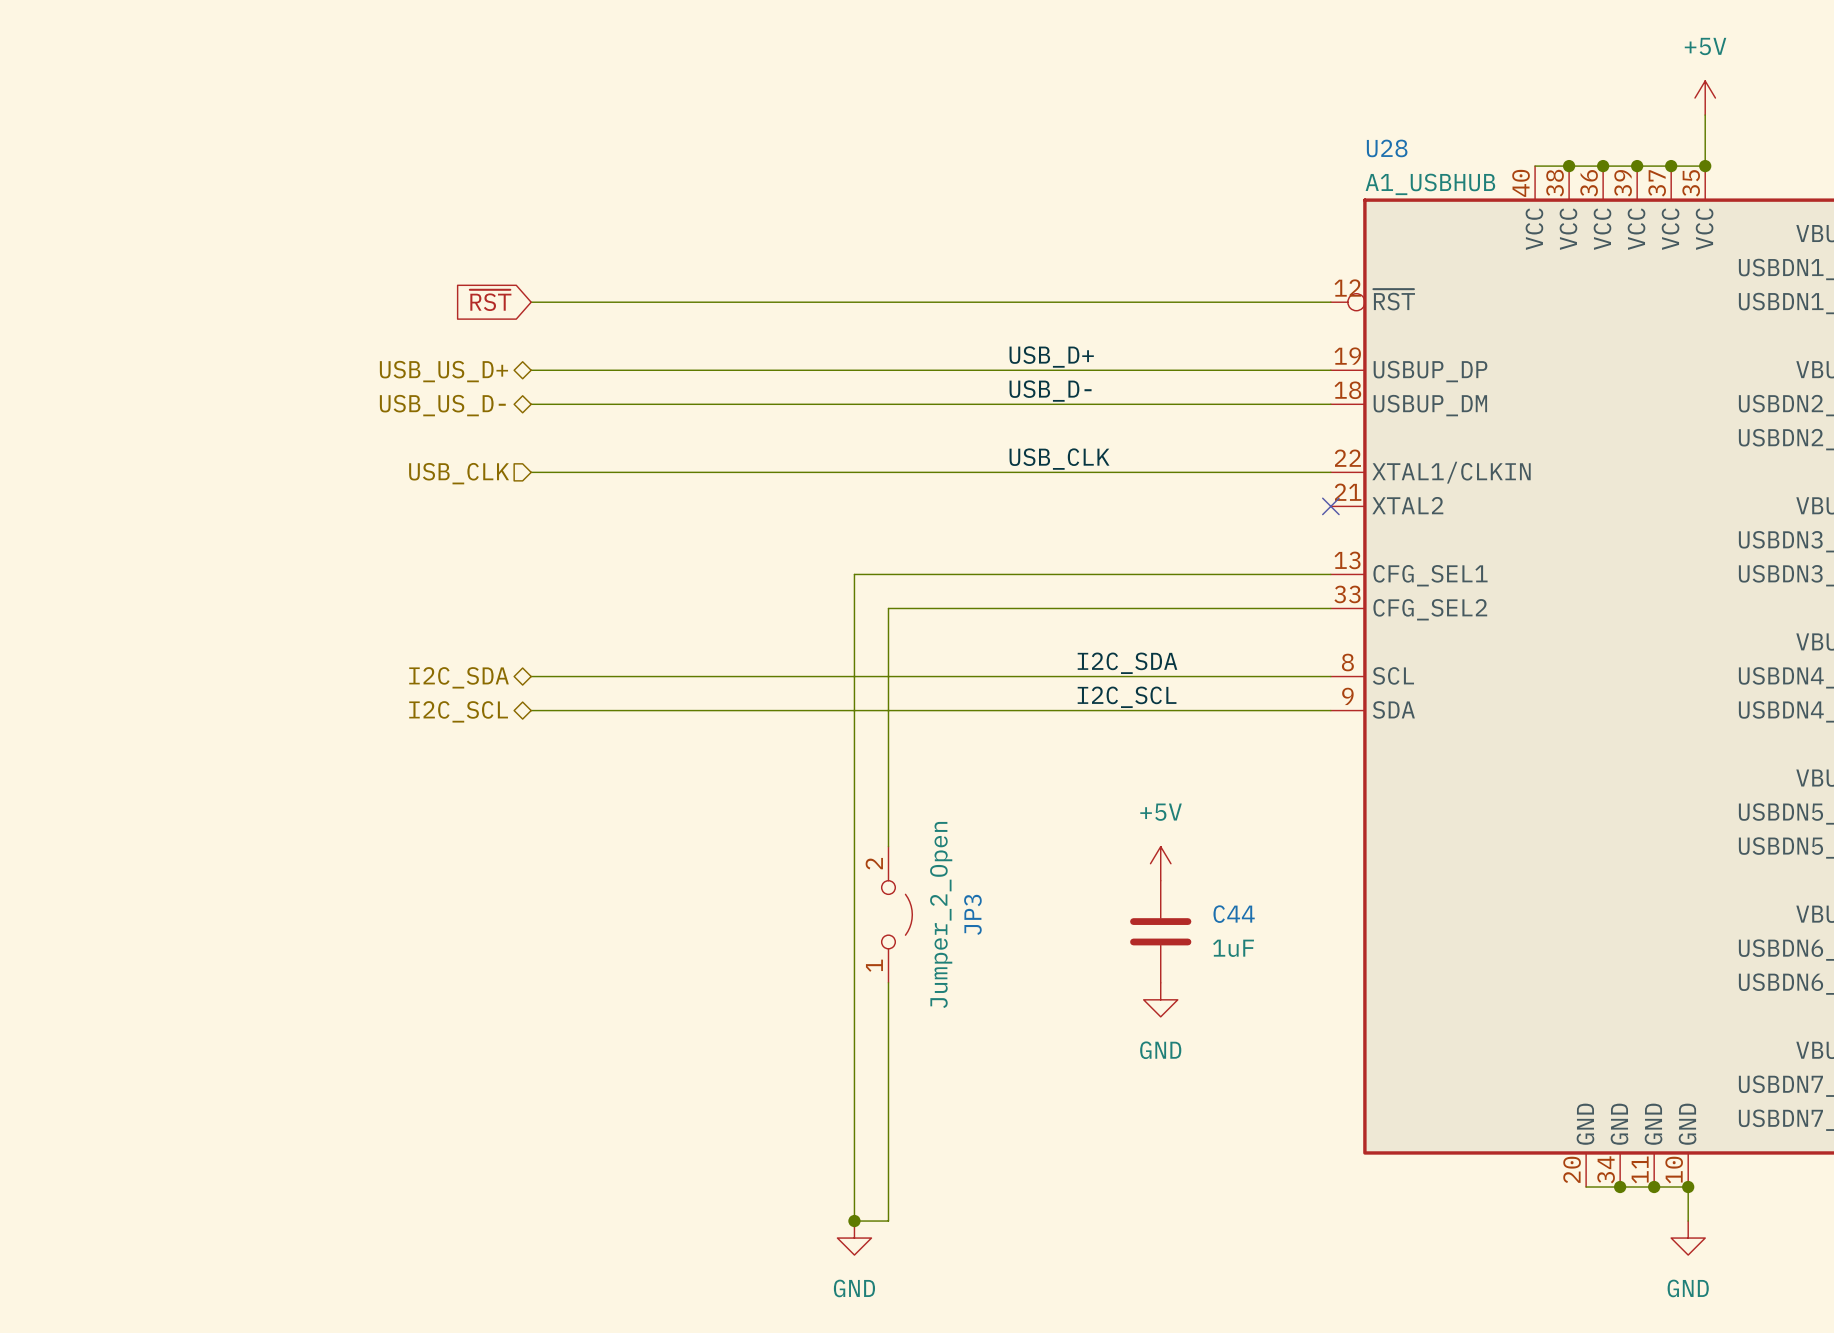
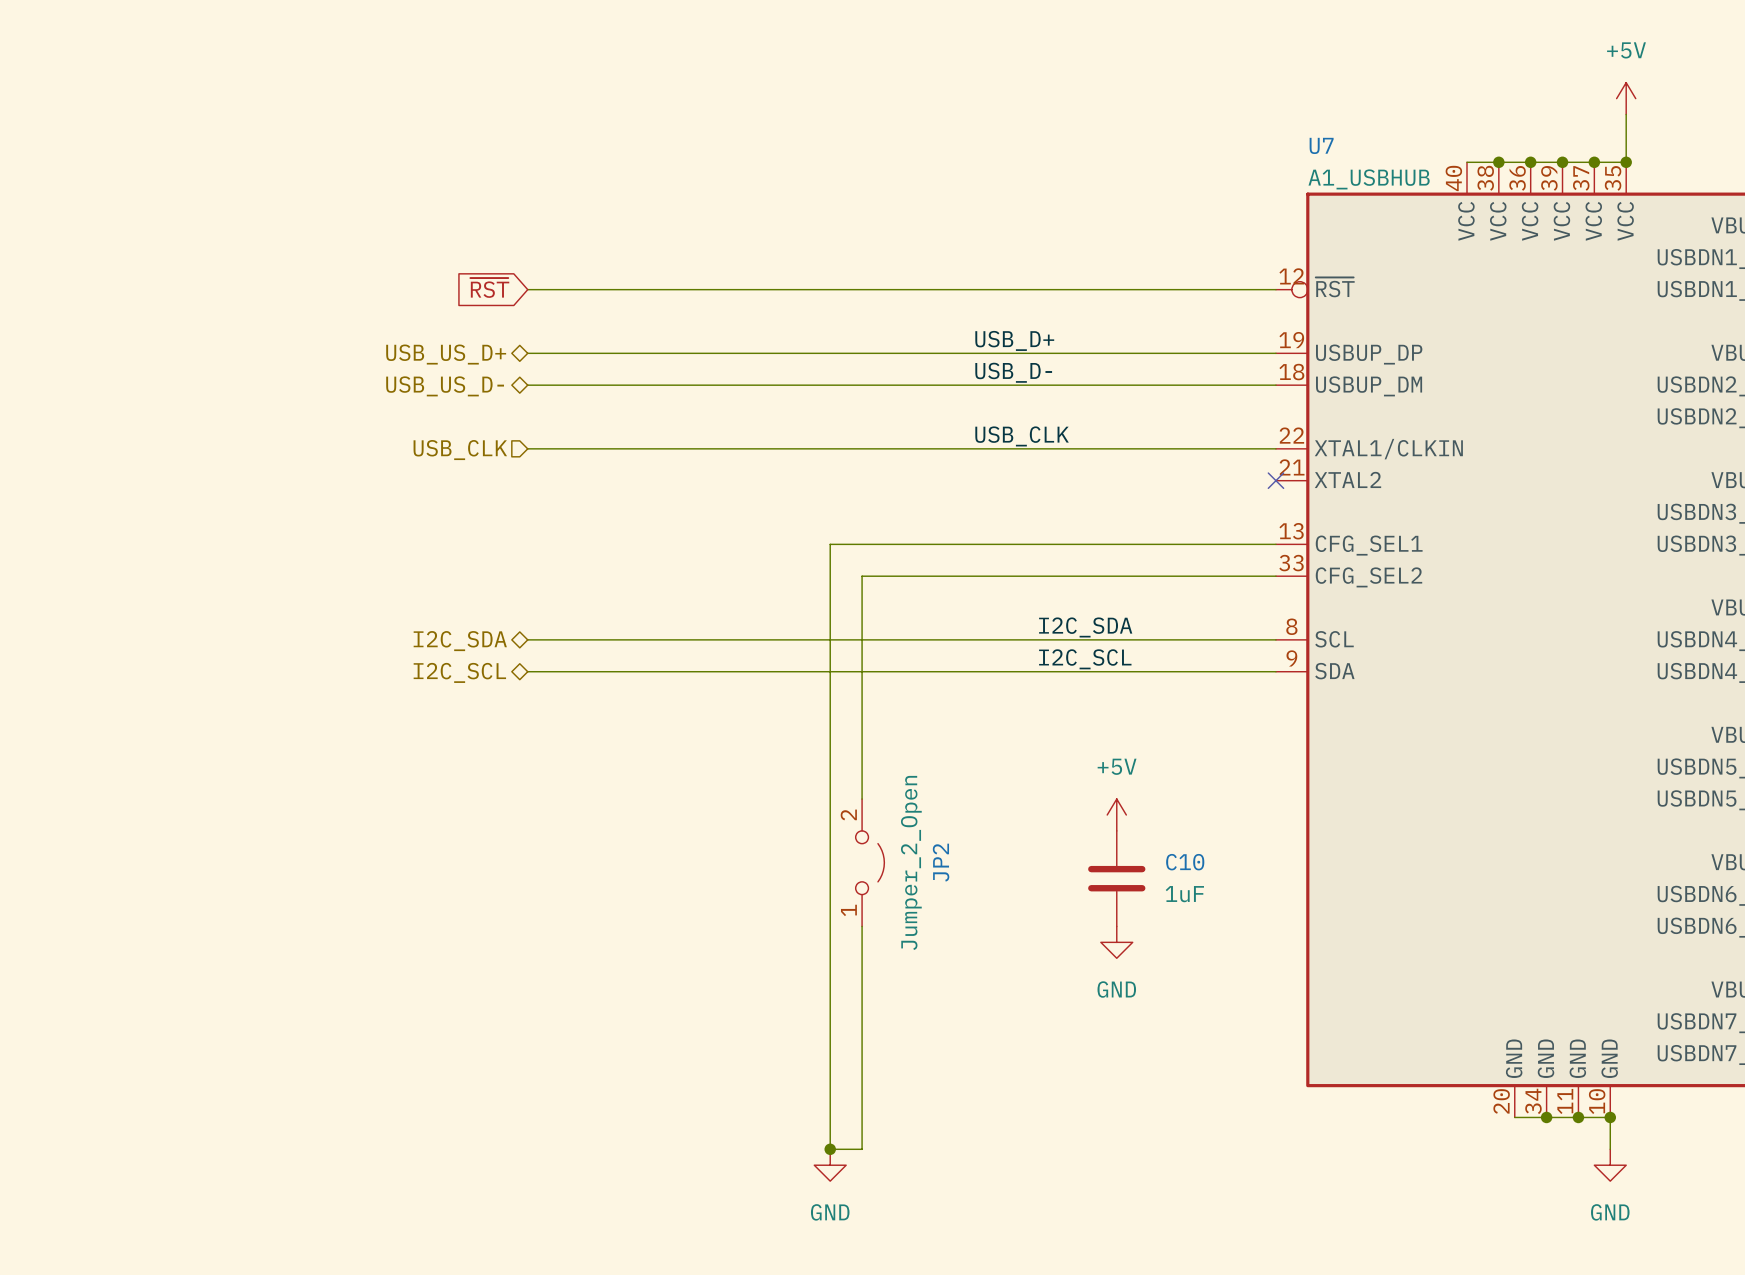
U28 name: U28 (1387, 148) -> U7 (1321, 145)
JP3 name: JP3 (972, 914) -> JP2 (941, 862)
C44 name: C44 (1234, 914) -> C10 (1185, 862)

